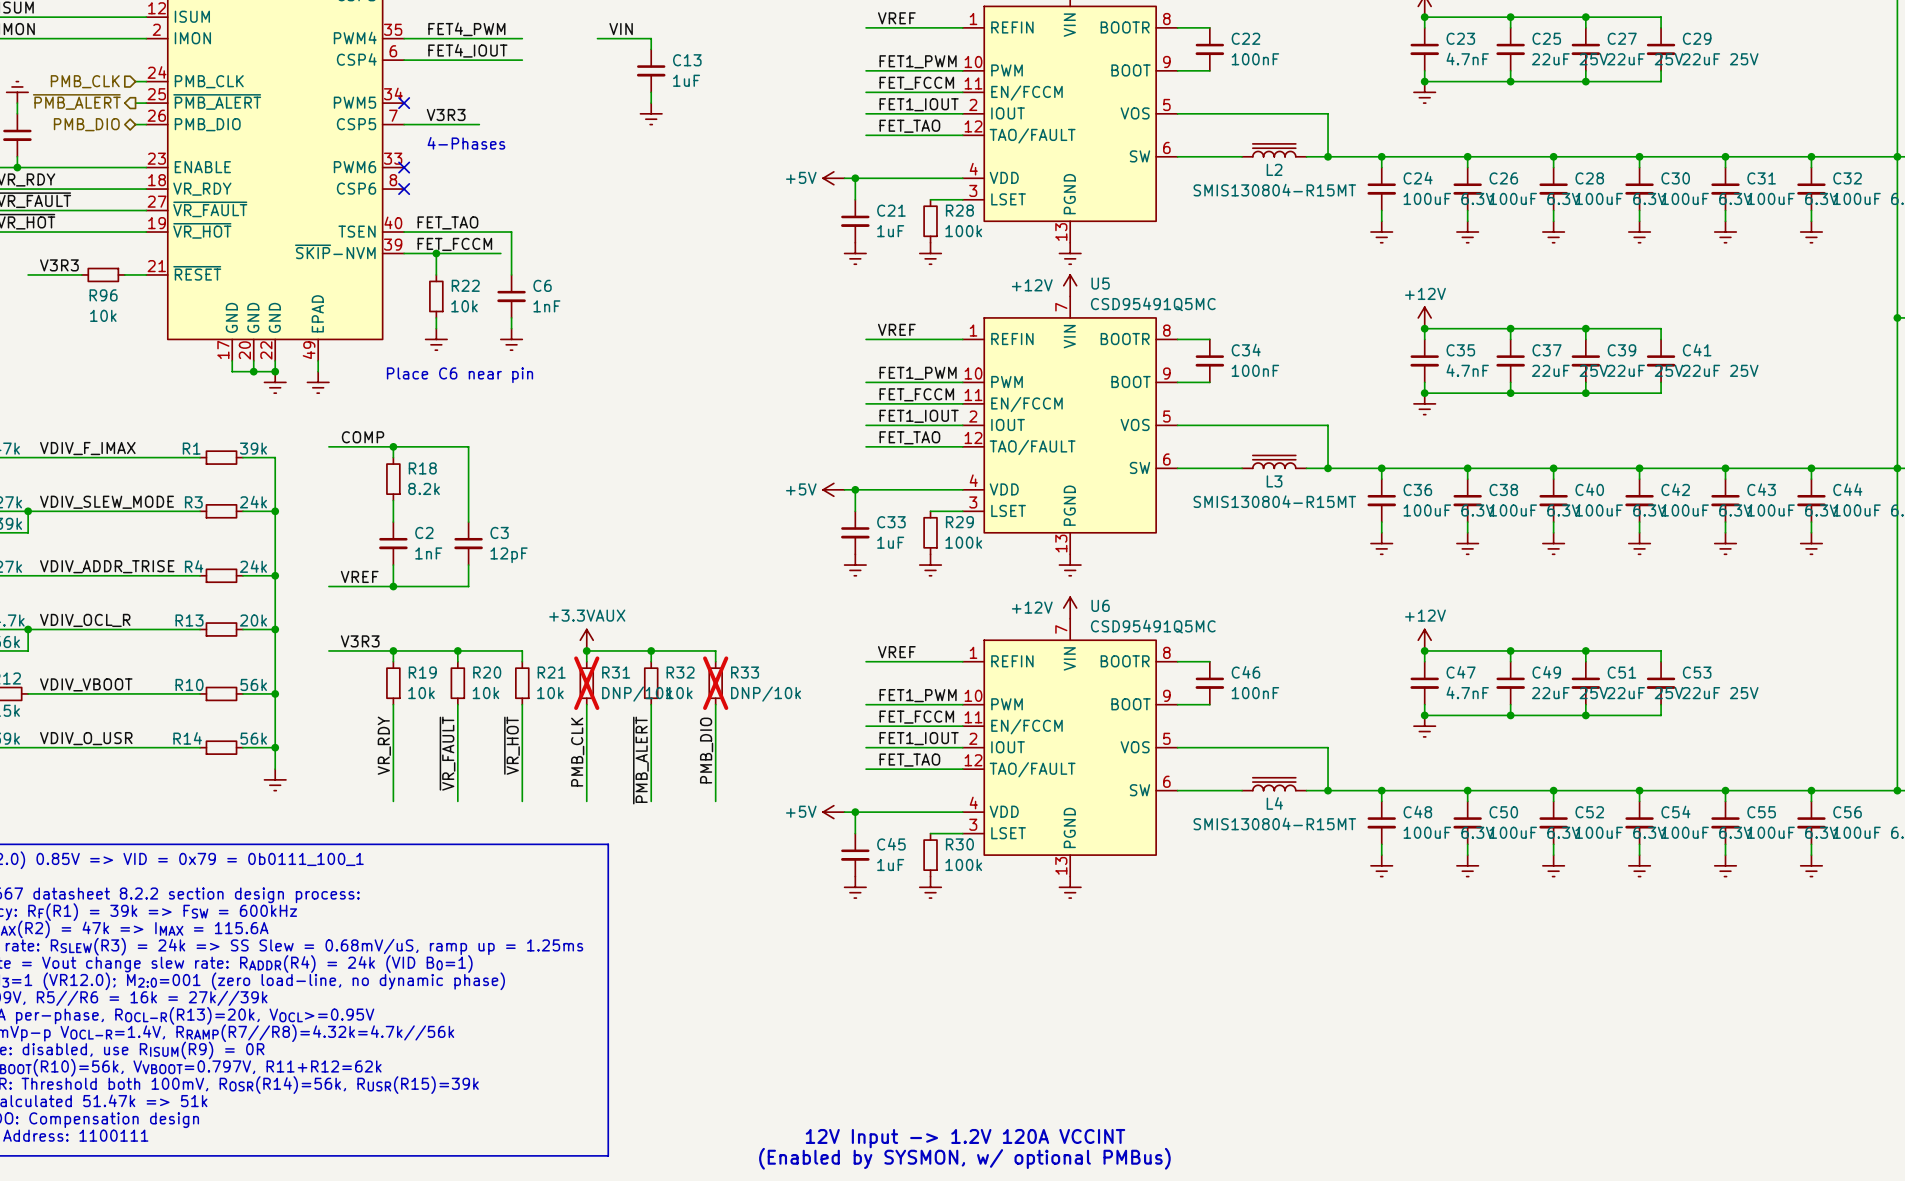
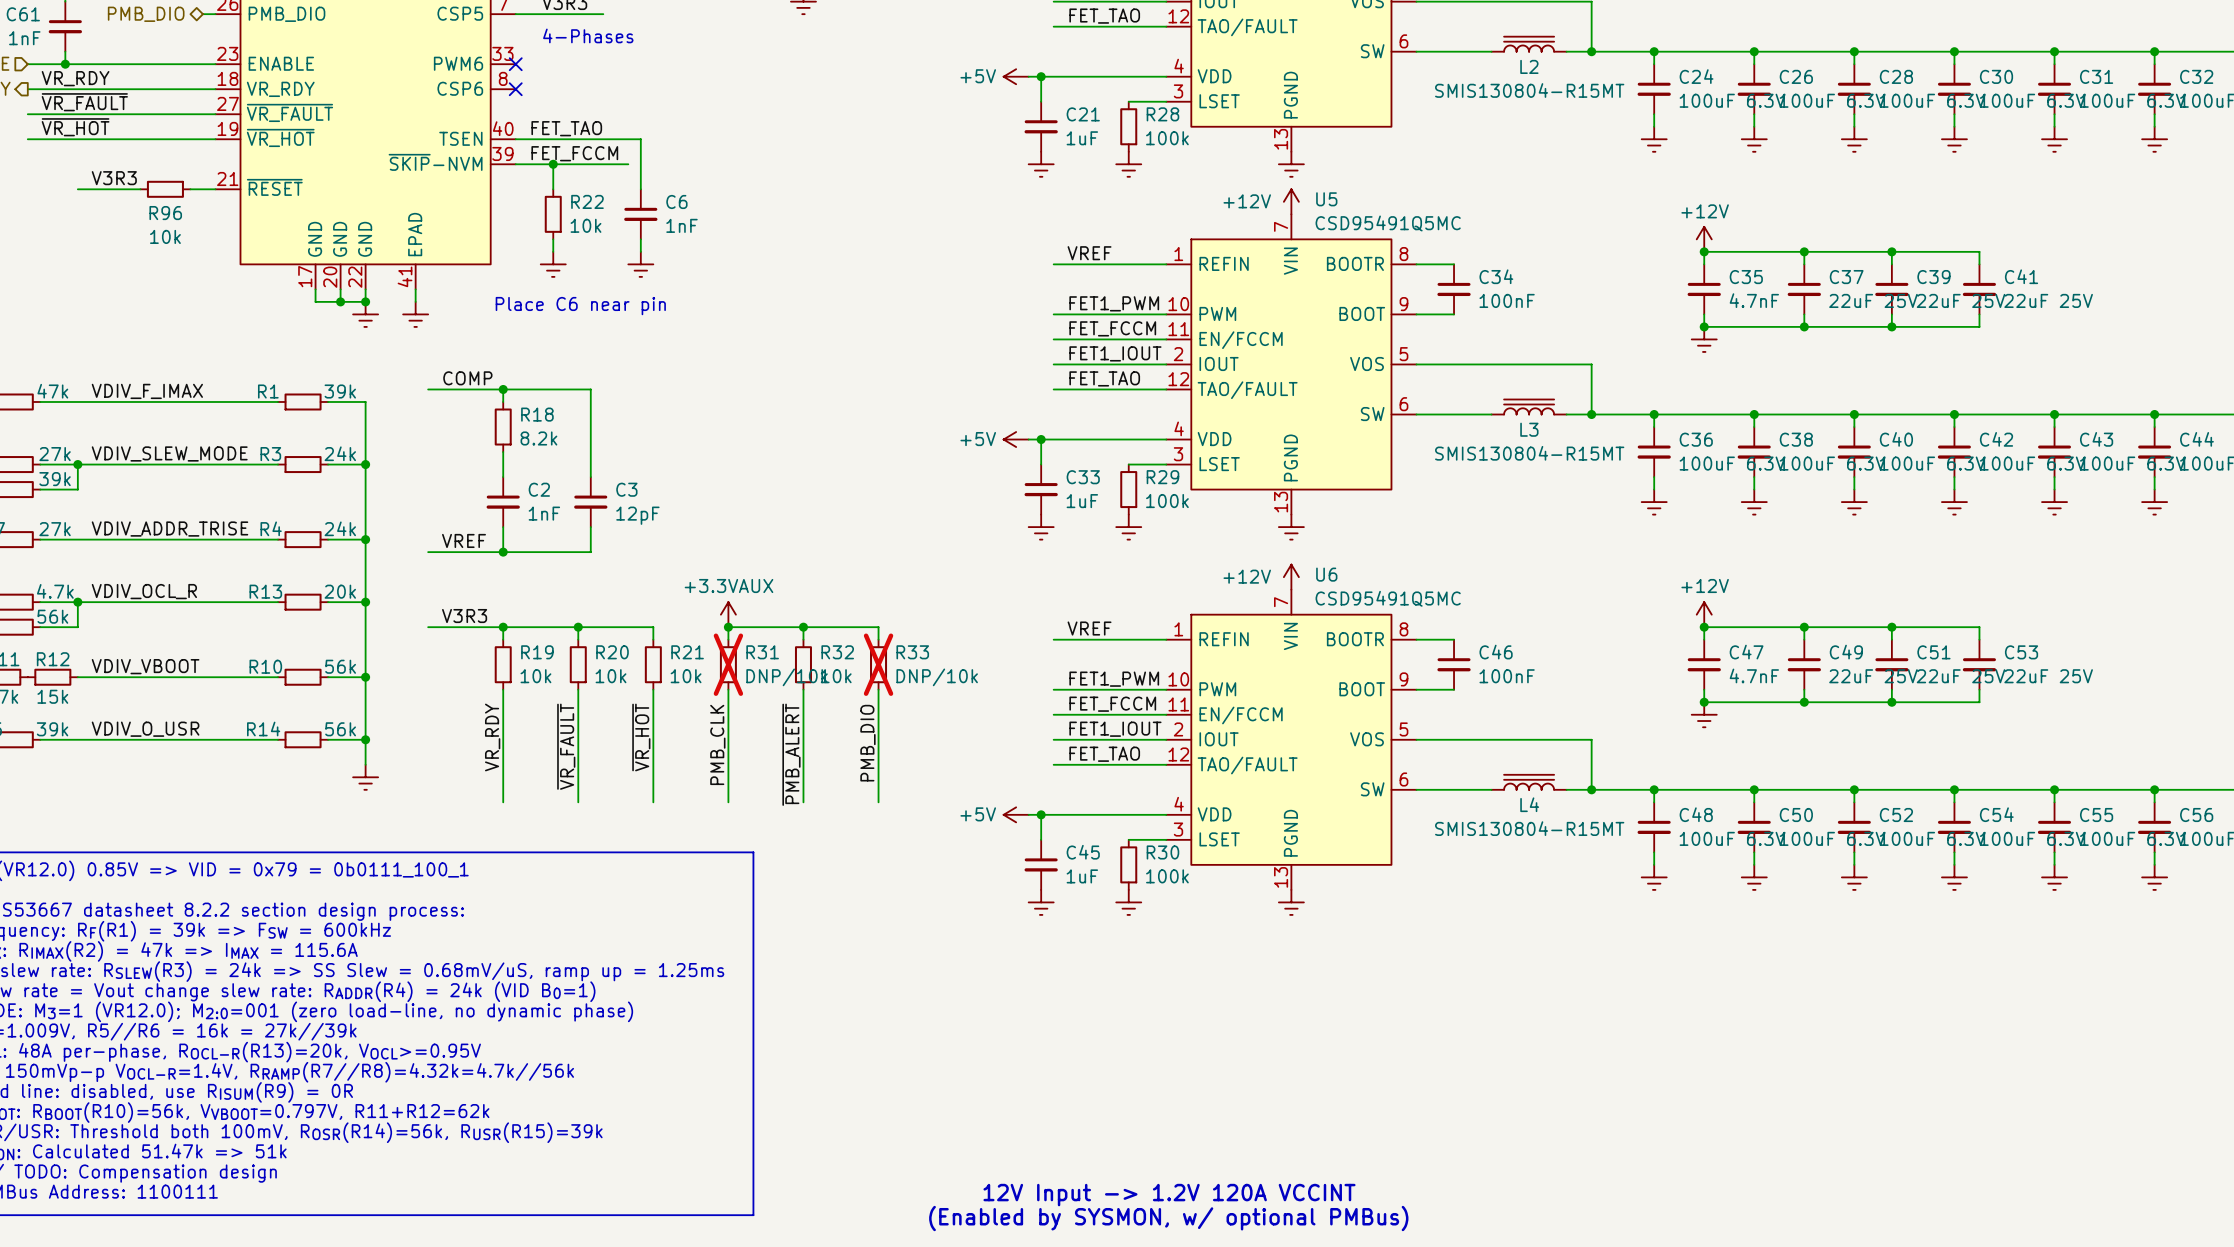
part pin number: 49 (309, 350) -> 41 (405, 276)

